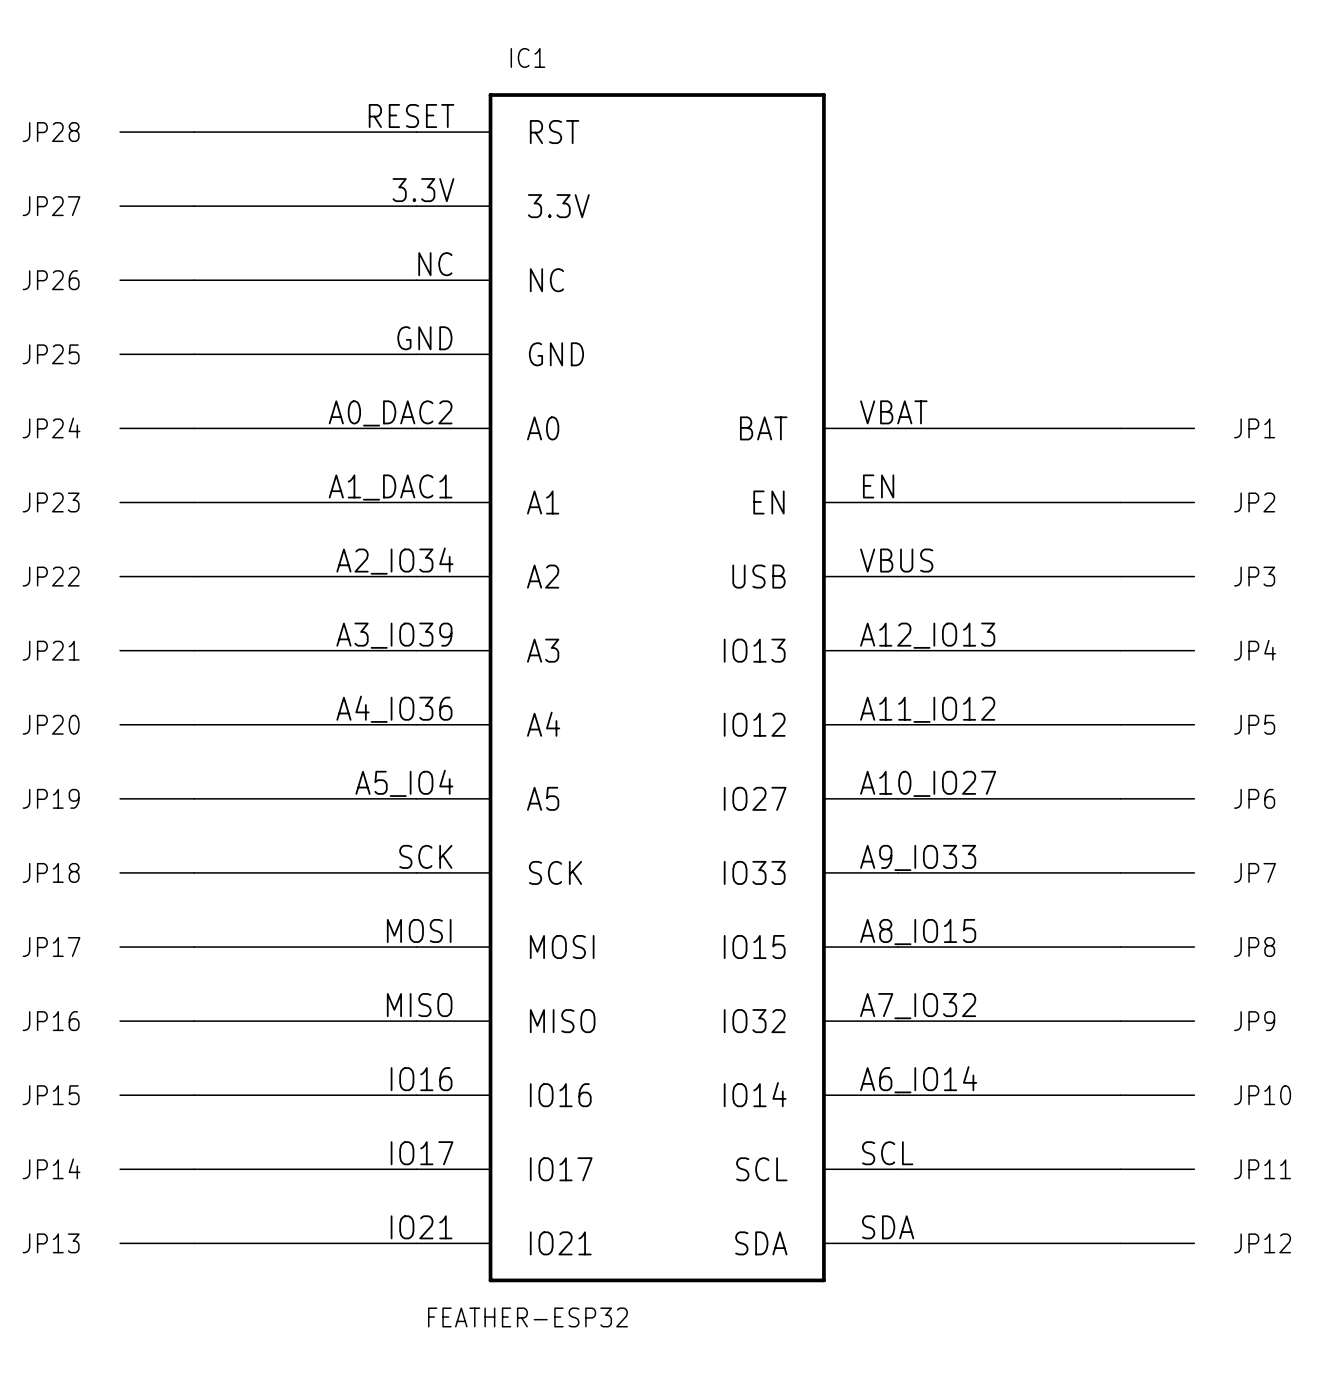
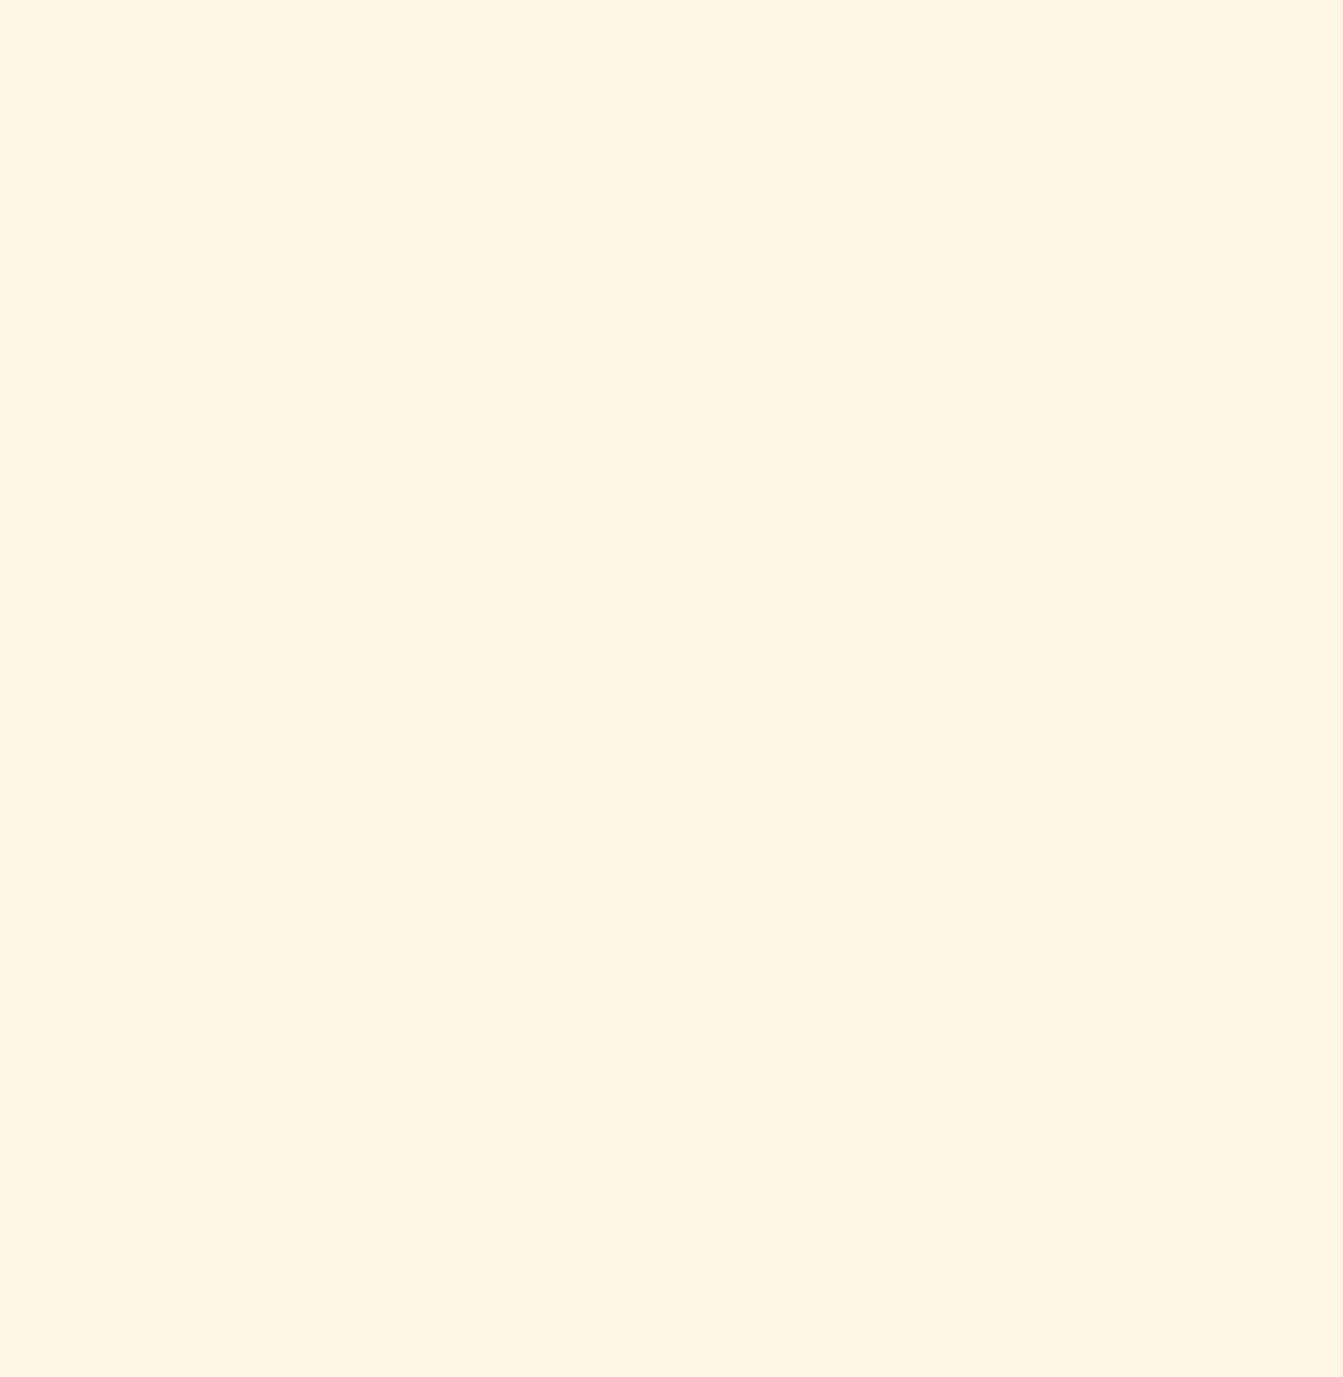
JP28: (157, 132) -> none
wire: (194, 132) (416, 132) -> none
JP27: (157, 206) -> none
wire: (194, 206) (416, 206) -> none
JP26: (157, 280) -> none
wire: (194, 280) (416, 280) -> none
JP25: (157, 354) -> none
wire: (194, 354) (416, 354) -> none
JP24: (157, 428) -> none
wire: (194, 428) (416, 428) -> none
wire: (898, 428) (1120, 428) -> none
JP1: (1157, 428) -> none
JP23: (157, 502) -> none
wire: (194, 502) (416, 502) -> none
wire: (898, 502) (1120, 502) -> none
JP2: (1157, 502) -> none
JP22: (157, 576) -> none
wire: (194, 576) (416, 576) -> none
wire: (898, 576) (1120, 576) -> none
JP3: (1157, 576) -> none
JP21: (157, 650) -> none
wire: (194, 650) (416, 650) -> none
wire: (898, 650) (1120, 650) -> none
JP4: (1157, 650) -> none
IC1: FEATHER-ESP32 (657, 687) -> none
JP20: (157, 724) -> none
wire: (194, 724) (416, 724) -> none
wire: (898, 724) (1120, 724) -> none
JP5: (1157, 724) -> none
JP19: (157, 798) -> none
wire: (194, 798) (416, 798) -> none
wire: (898, 798) (1120, 798) -> none
JP6: (1157, 798) -> none
JP18: (157, 872) -> none
wire: (194, 872) (416, 872) -> none
wire: (898, 872) (1120, 872) -> none
JP7: (1157, 872) -> none
JP17: (157, 947) -> none
wire: (194, 947) (416, 947) -> none
wire: (898, 947) (1120, 947) -> none
JP8: (1157, 947) -> none
JP16: (157, 1021) -> none
wire: (194, 1021) (416, 1021) -> none
wire: (898, 1021) (1120, 1021) -> none
JP9: (1157, 1021) -> none
JP15: (157, 1095) -> none
wire: (194, 1095) (416, 1095) -> none
wire: (898, 1095) (1120, 1095) -> none
JP10: (1157, 1095) -> none
JP14: (157, 1169) -> none
wire: (194, 1169) (416, 1169) -> none
wire: (898, 1169) (1120, 1169) -> none
JP11: (1157, 1169) -> none
JP13: (157, 1243) -> none
wire: (194, 1243) (416, 1243) -> none
wire: (898, 1243) (1120, 1243) -> none
JP12: (1157, 1243) -> none

